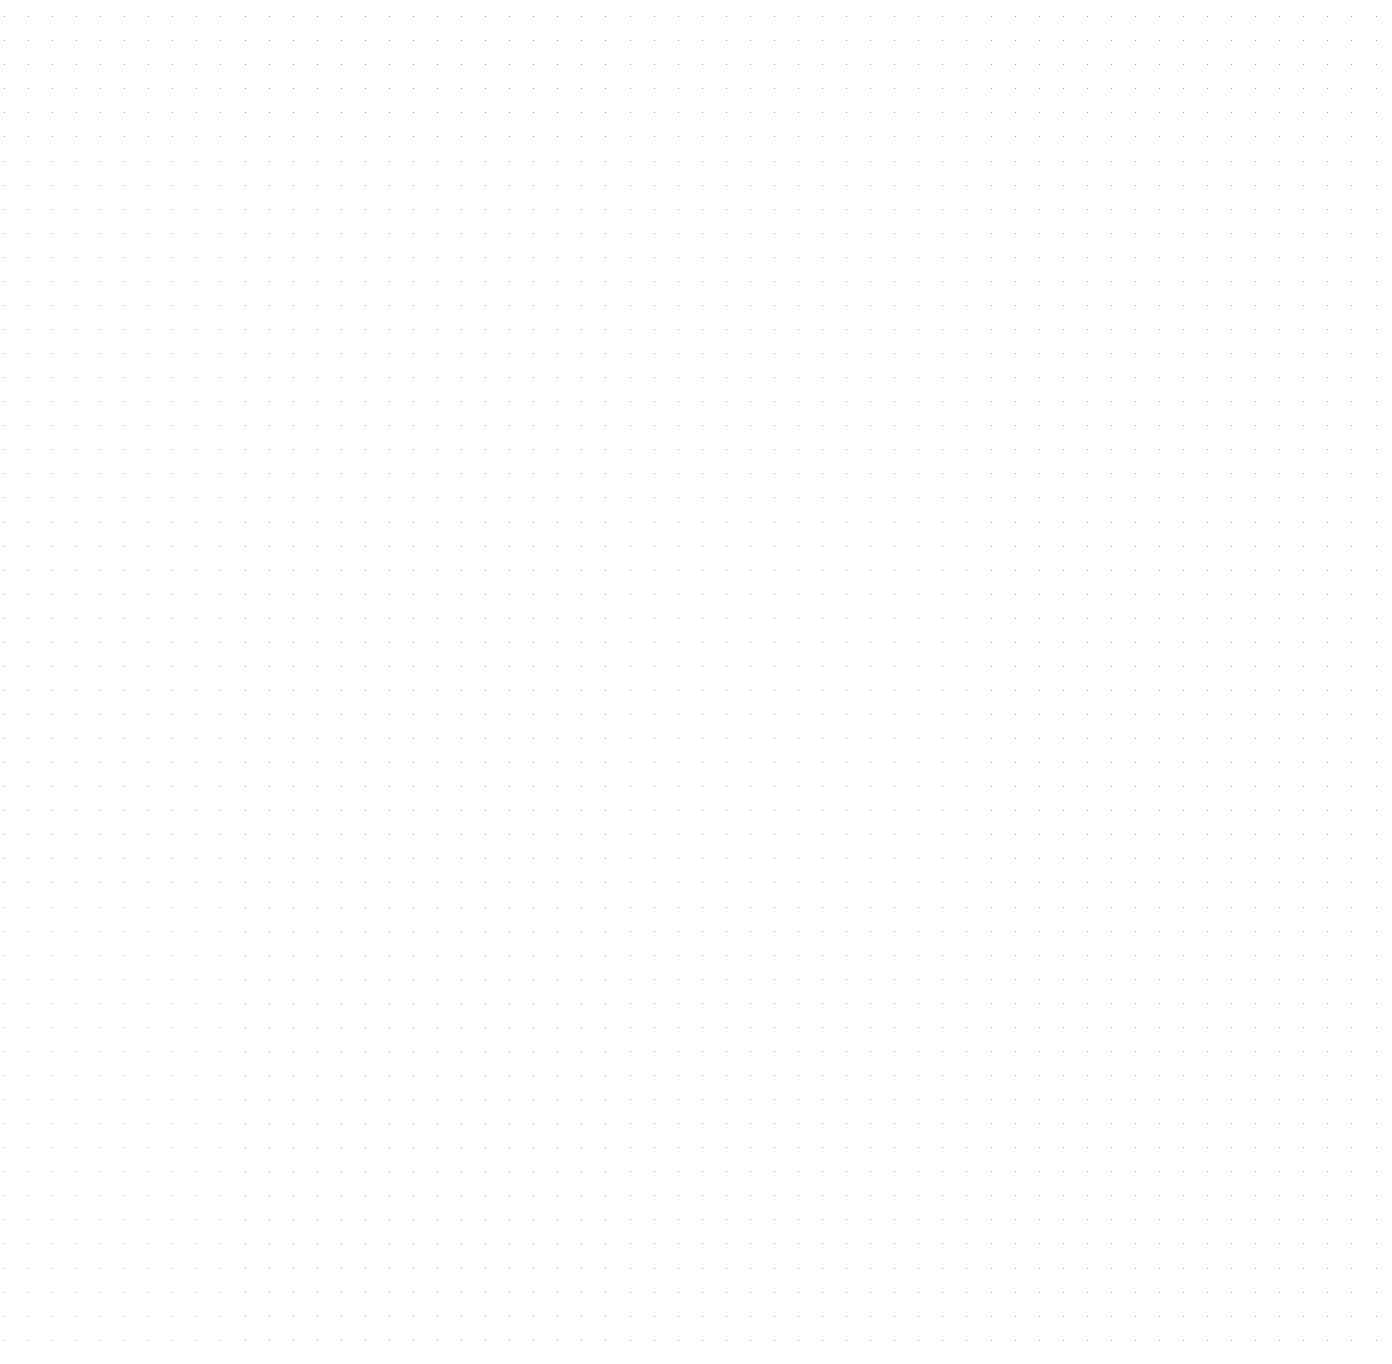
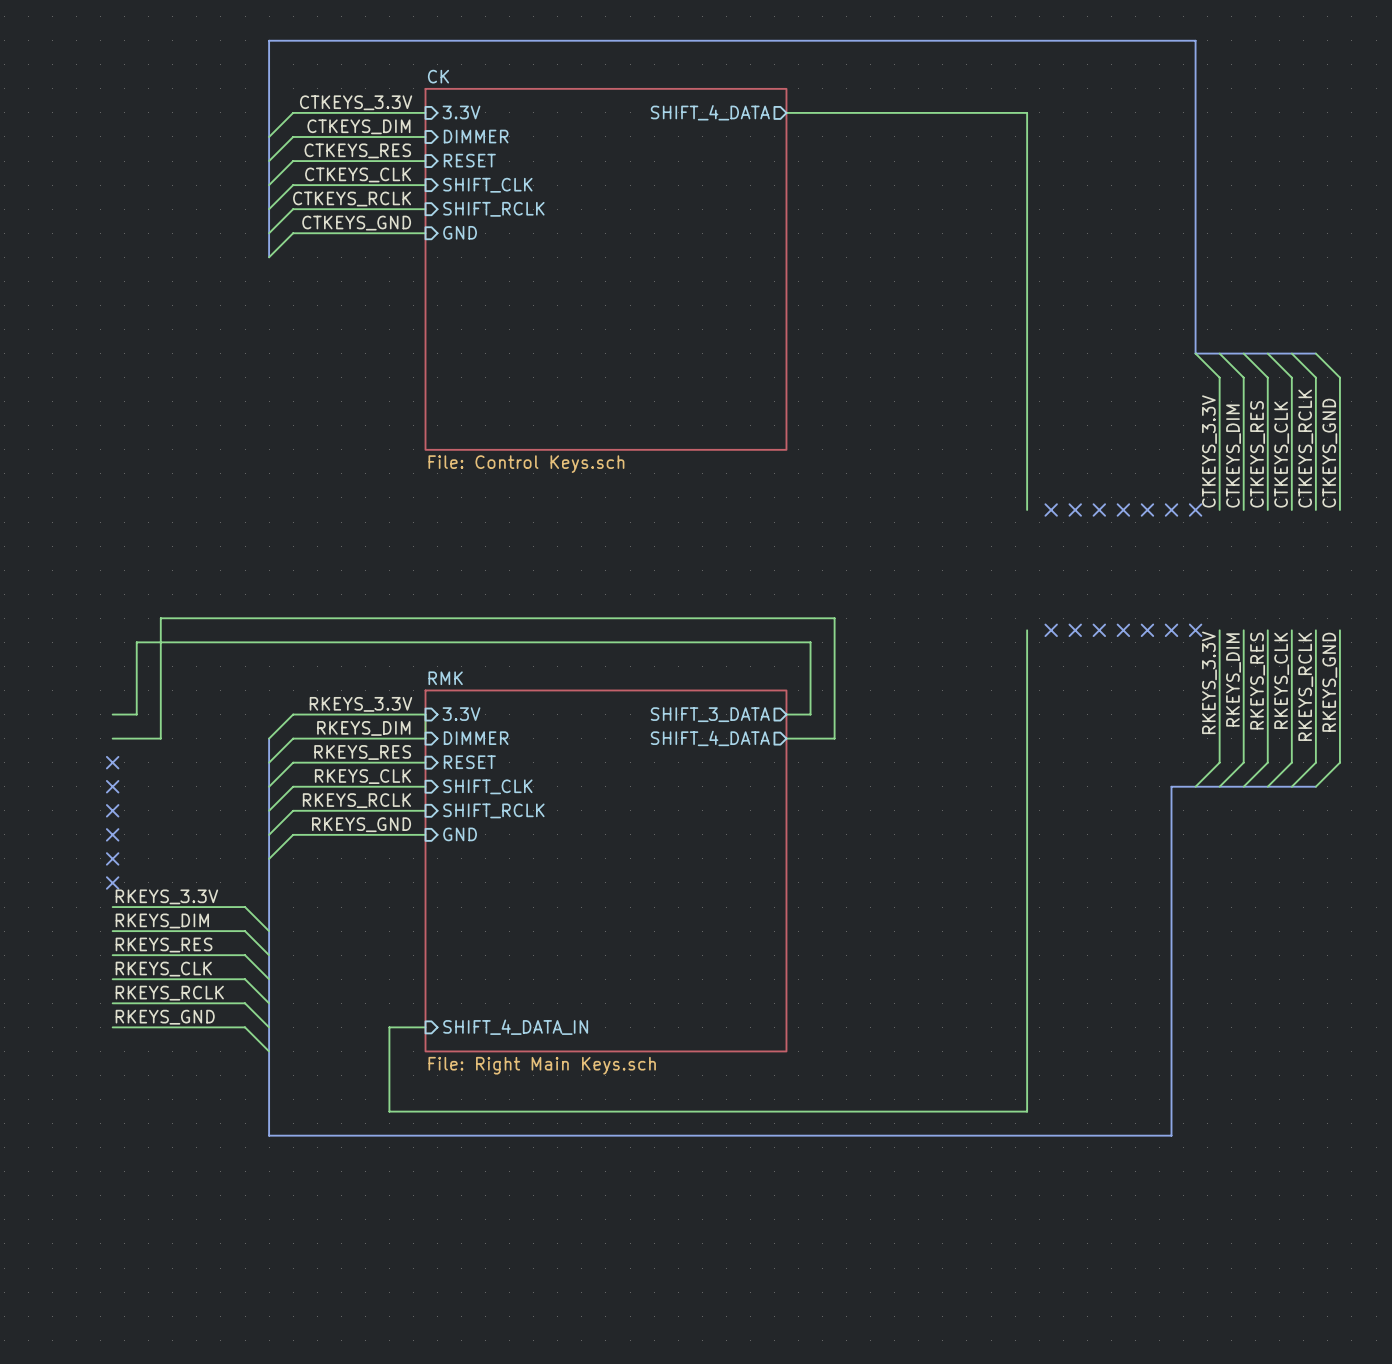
label: none -> CTKEYS_3.3V (356, 102)
wire: none -> (425, 112) (293, 112) (269, 136)
sheet pin: none -> 3.3V (461, 112)
sheet pin: none -> SHIFT_4_DATA (710, 112)
wire: none -> (786, 112) (1027, 112) (1027, 509)
label: none -> CTKEYS_DIM (358, 126)
wire: none -> (425, 136) (293, 136) (269, 161)
sheet pin: none -> DIMMER (476, 136)
label: none -> CTKEYS_RES (357, 150)
sheet pin: none -> RESET (469, 160)
wire: none -> (425, 161) (293, 161) (269, 185)
label: none -> CTKEYS_CLK (358, 174)
wire: none -> (425, 185) (293, 185) (269, 209)
sheet pin: none -> SHIFT_CLK (487, 185)
label: none -> CTKEYS_RCLK (352, 199)
wire: none -> (425, 209) (293, 209) (269, 233)
sheet pin: none -> SHIFT_RCLK (493, 209)
label: none -> CTKEYS_GND (356, 223)
sheet pin: none -> GND (460, 232)
wire: none -> (425, 233) (293, 233) (269, 257)
bus: none -> (269, 257) (269, 40) (1195, 40) (1195, 353) (1315, 353)
sheet CK: none -> File: Control Keys.sch (605, 269)
wire: none -> (1195, 353) (1219, 377) (1219, 509)
wire: none -> (1219, 353) (1243, 377) (1243, 509)
wire: none -> (1243, 353) (1267, 377) (1267, 509)
wire: none -> (1267, 353) (1291, 377) (1291, 509)
wire: none -> (1291, 353) (1315, 377) (1315, 509)
wire: none -> (1315, 353) (1339, 377) (1339, 509)
label: none -> CTKEYS_RCLK (1305, 448)
label: none -> CTKEYS_3.3V (1209, 451)
label: none -> CTKEYS_GND (1329, 453)
label: none -> CTKEYS_RES (1257, 454)
label: none -> CTKEYS_CLK (1281, 454)
label: none -> CTKEYS_DIM (1233, 456)
no-connect mark: none -> (1051, 509)
no-connect mark: none -> (1075, 509)
no-connect mark: none -> (1099, 509)
no-connect mark: none -> (1123, 509)
no-connect mark: none -> (1147, 509)
no-connect mark: none -> (1171, 509)
no-connect mark: none -> (1195, 509)
wire: none -> (1027, 630) (1027, 1111) (389, 1111) (389, 1027) (425, 1027)
no-connect mark: none -> (1051, 630)
no-connect mark: none -> (1075, 630)
no-connect mark: none -> (1099, 630)
no-connect mark: none -> (1123, 630)
no-connect mark: none -> (1147, 630)
no-connect mark: none -> (1171, 630)
no-connect mark: none -> (1195, 630)
wire: none -> (1219, 630) (1219, 762) (1195, 786)
wire: none -> (1243, 630) (1243, 762) (1219, 786)
wire: none -> (1267, 630) (1267, 762) (1243, 786)
wire: none -> (1291, 630) (1291, 762) (1267, 786)
wire: none -> (1315, 630) (1315, 762) (1291, 786)
wire: none -> (1339, 630) (1339, 762) (1315, 786)
label: none -> RKEYS_DIM (1233, 679)
label: none -> RKEYS_CLK (1281, 680)
label: none -> RKEYS_RES (1257, 681)
label: none -> RKEYS_3.3V (1209, 682)
label: none -> RKEYS_GND (1329, 682)
label: none -> RKEYS_RCLK (1305, 686)
label: none -> RKEYS_3.3V (360, 704)
wire: none -> (112, 714) (136, 714) (136, 642) (810, 642) (810, 714) (786, 714)
sheet pin: none -> 3.3V (461, 714)
sheet pin: none -> SHIFT_3_DATA (710, 714)
label: none -> RKEYS_DIM (363, 728)
wire: none -> (112, 738) (160, 738) (160, 618) (834, 618) (834, 738) (786, 738)
wire: none -> (269, 738) (293, 714) (425, 714) (425, 738) (293, 738) (269, 762)
bus: none -> (269, 738) (269, 1135) (1171, 1135) (1171, 786) (1315, 786)
sheet pin: none -> DIMMER (476, 738)
sheet pin: none -> SHIFT_4_DATA (710, 738)
label: none -> RKEYS_RES (362, 752)
no-connect mark: none -> (112, 762)
wire: none -> (425, 762) (293, 762) (269, 786)
sheet pin: none -> RESET (469, 762)
label: none -> RKEYS_CLK (362, 776)
no-connect mark: none -> (112, 786)
wire: none -> (425, 786) (293, 786) (269, 810)
sheet pin: none -> SHIFT_CLK (487, 786)
label: none -> RKEYS_RCLK (356, 800)
no-connect mark: none -> (112, 810)
wire: none -> (425, 810) (293, 810) (269, 834)
sheet pin: none -> SHIFT_RCLK (493, 810)
label: none -> RKEYS_GND (361, 824)
no-connect mark: none -> (112, 834)
wire: none -> (425, 834) (293, 834) (269, 858)
sheet pin: none -> GND (460, 834)
no-connect mark: none -> (112, 858)
sheet RMK: none -> File: Right Main Keys.sch (605, 870)
no-connect mark: none -> (112, 882)
label: none -> RKEYS_3.3V (166, 896)
wire: none -> (112, 907) (245, 907) (269, 931)
label: none -> RKEYS_DIM (162, 920)
wire: none -> (112, 931) (245, 931) (269, 955)
label: none -> RKEYS_RES (164, 945)
wire: none -> (112, 955) (245, 955) (269, 979)
label: none -> RKEYS_CLK (163, 969)
wire: none -> (112, 979) (245, 979) (269, 1003)
label: none -> RKEYS_RCLK (169, 993)
wire: none -> (112, 1003) (245, 1003) (269, 1027)
label: none -> RKEYS_GND (165, 1017)
wire: none -> (112, 1027) (245, 1027) (269, 1051)
sheet pin: none -> SHIFT_4_DATA_IN (515, 1027)

